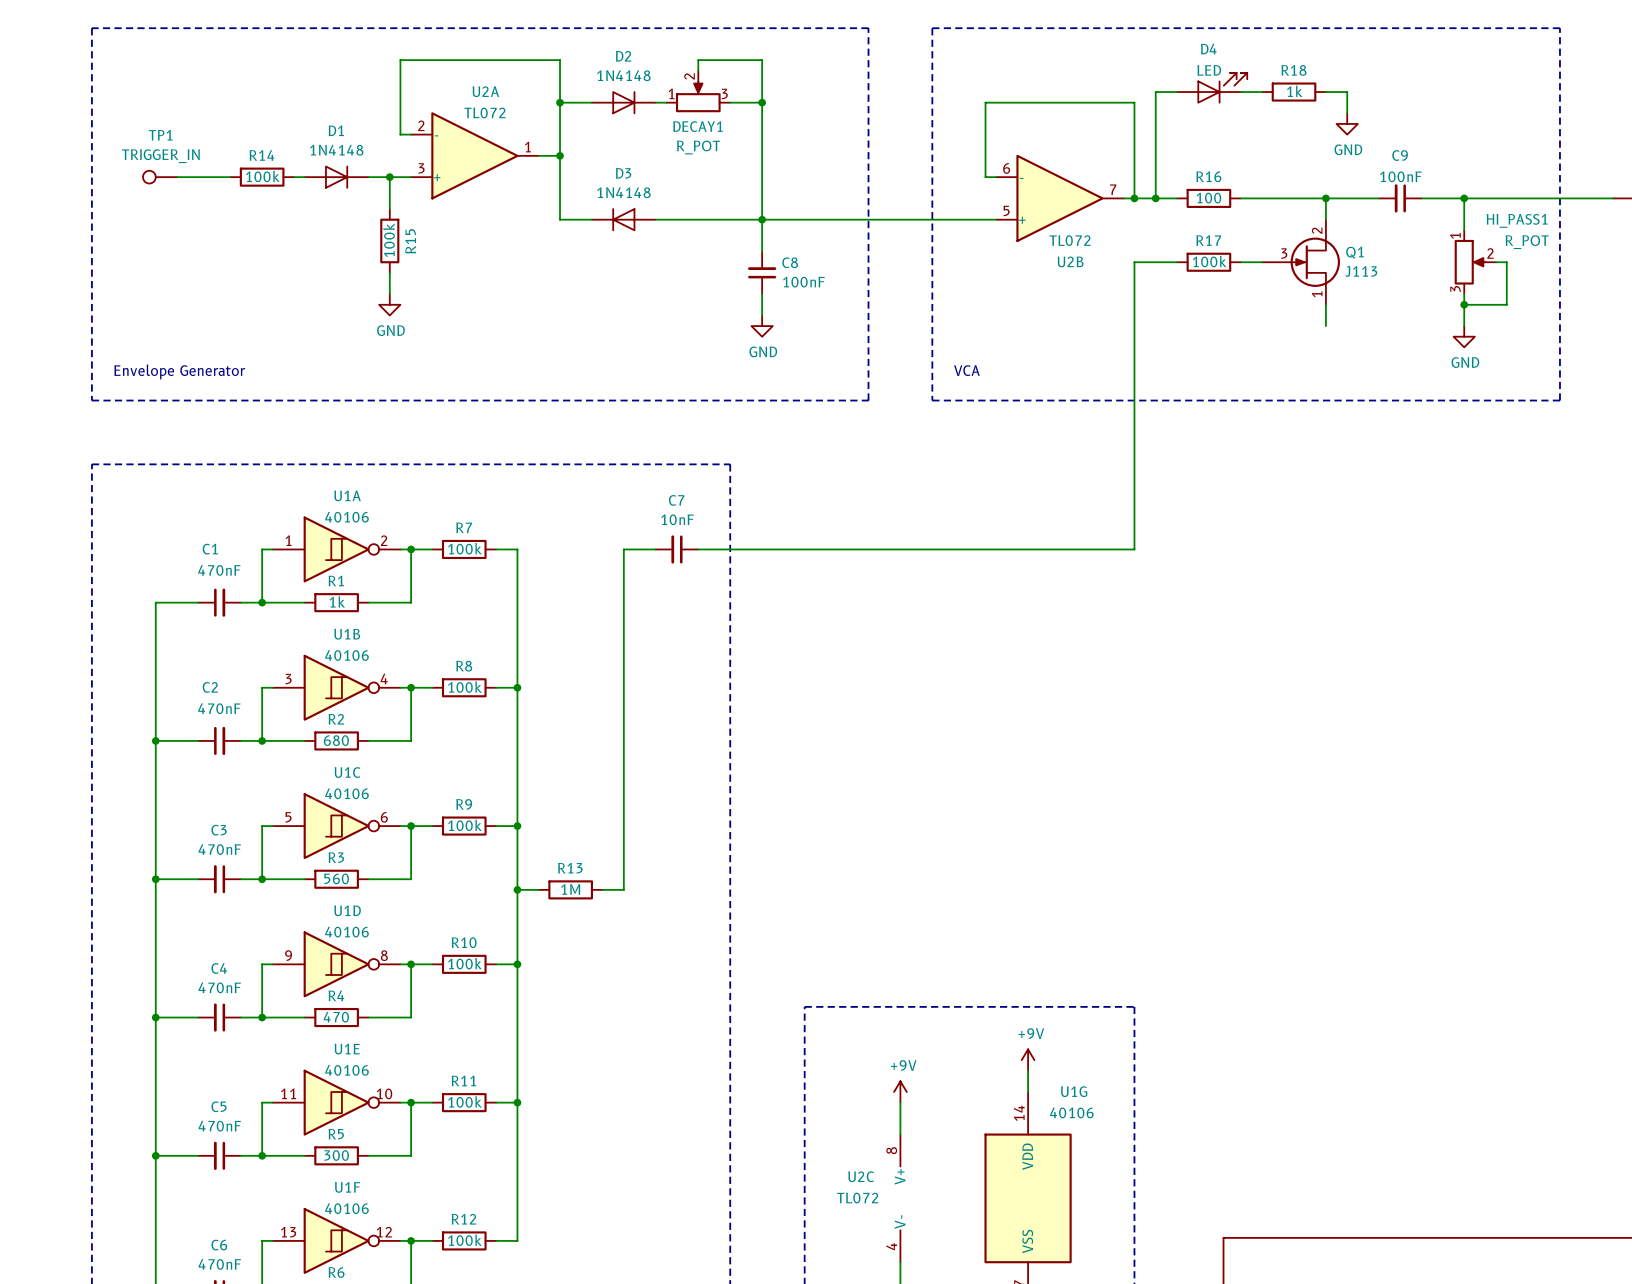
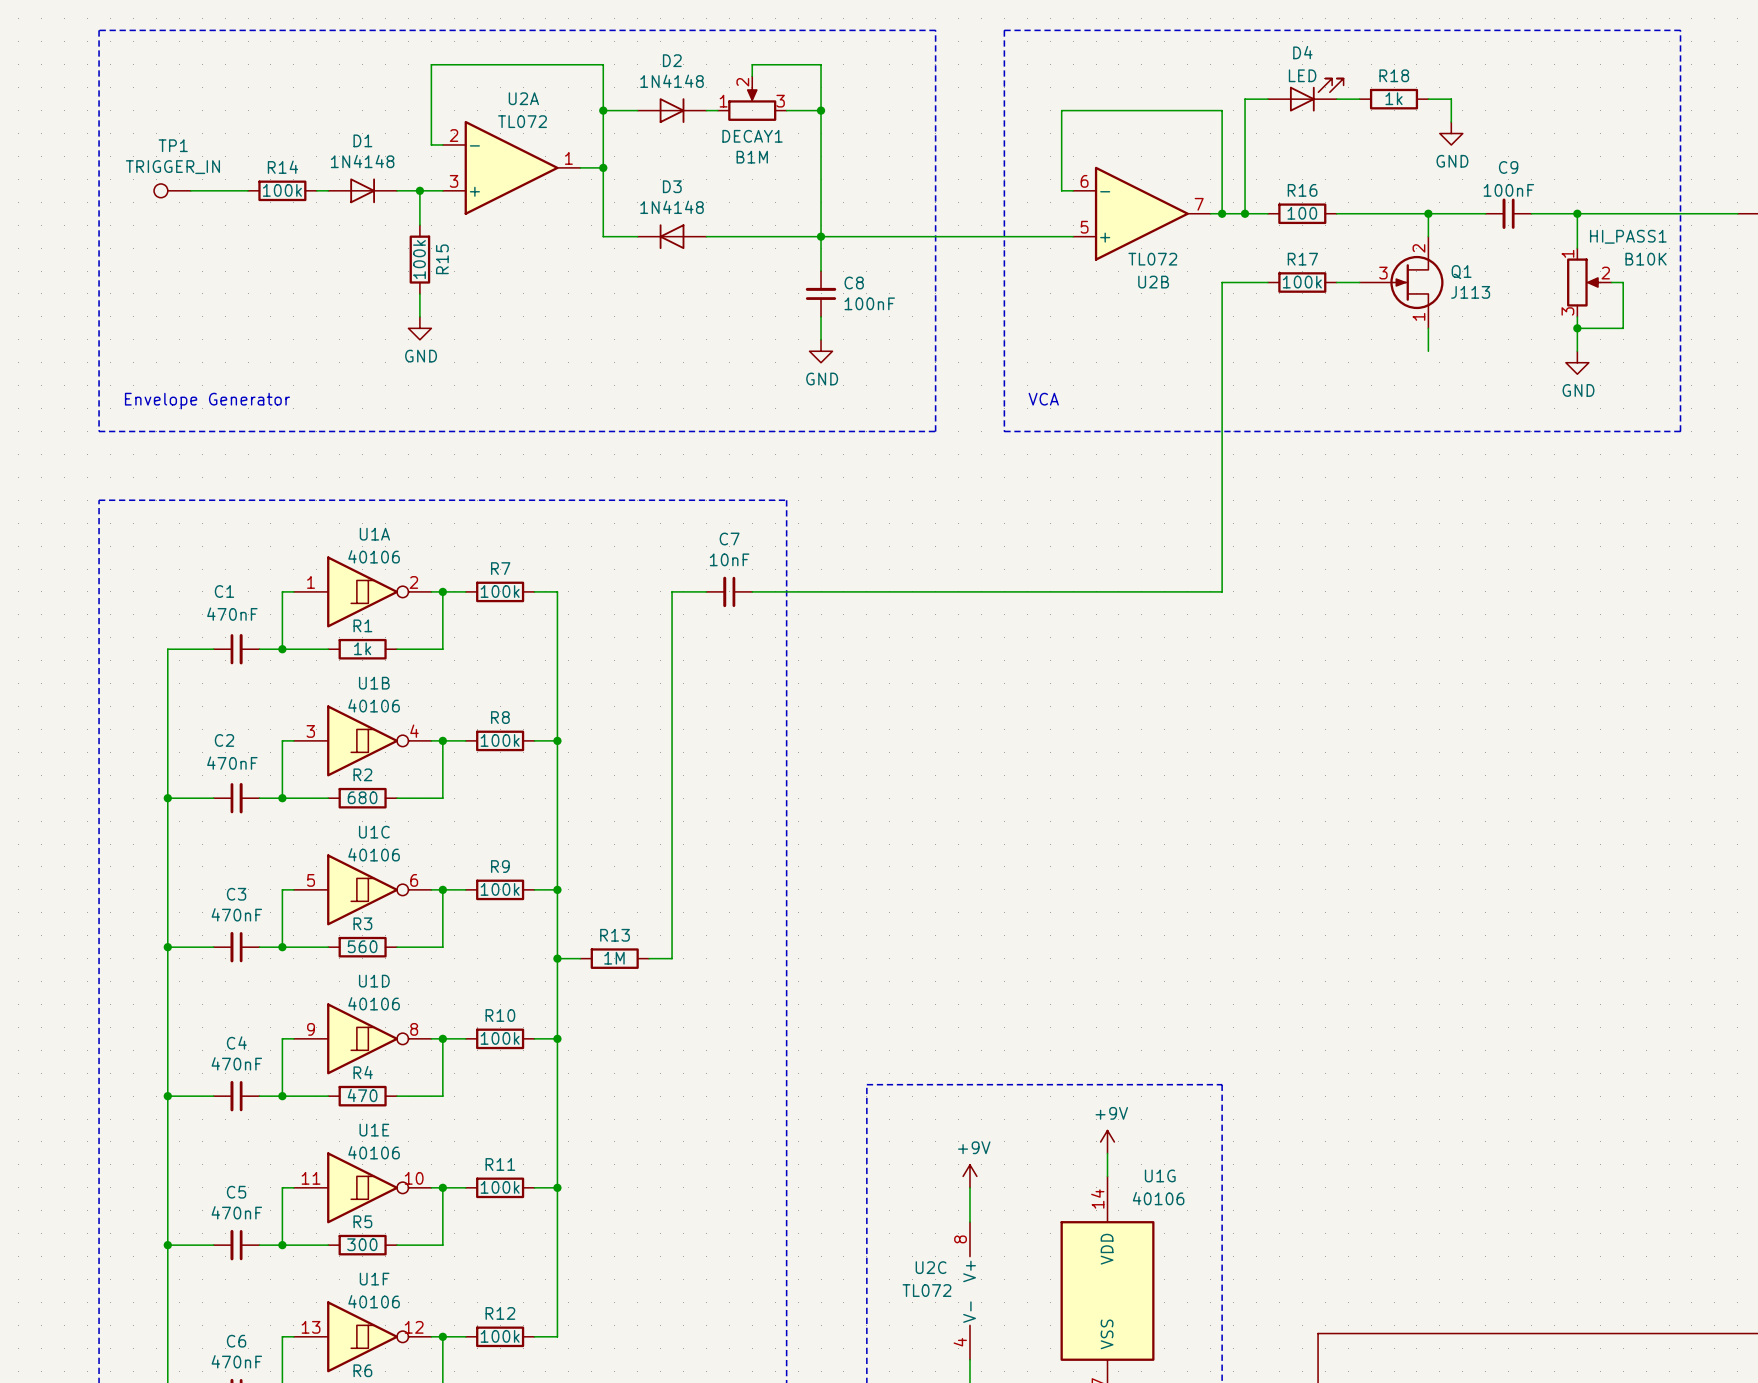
DECAY1 value: R_POT (698, 147) -> B1M (752, 157)
HI_PASS1 value: R_POT (1527, 242) -> B10K (1646, 259)

